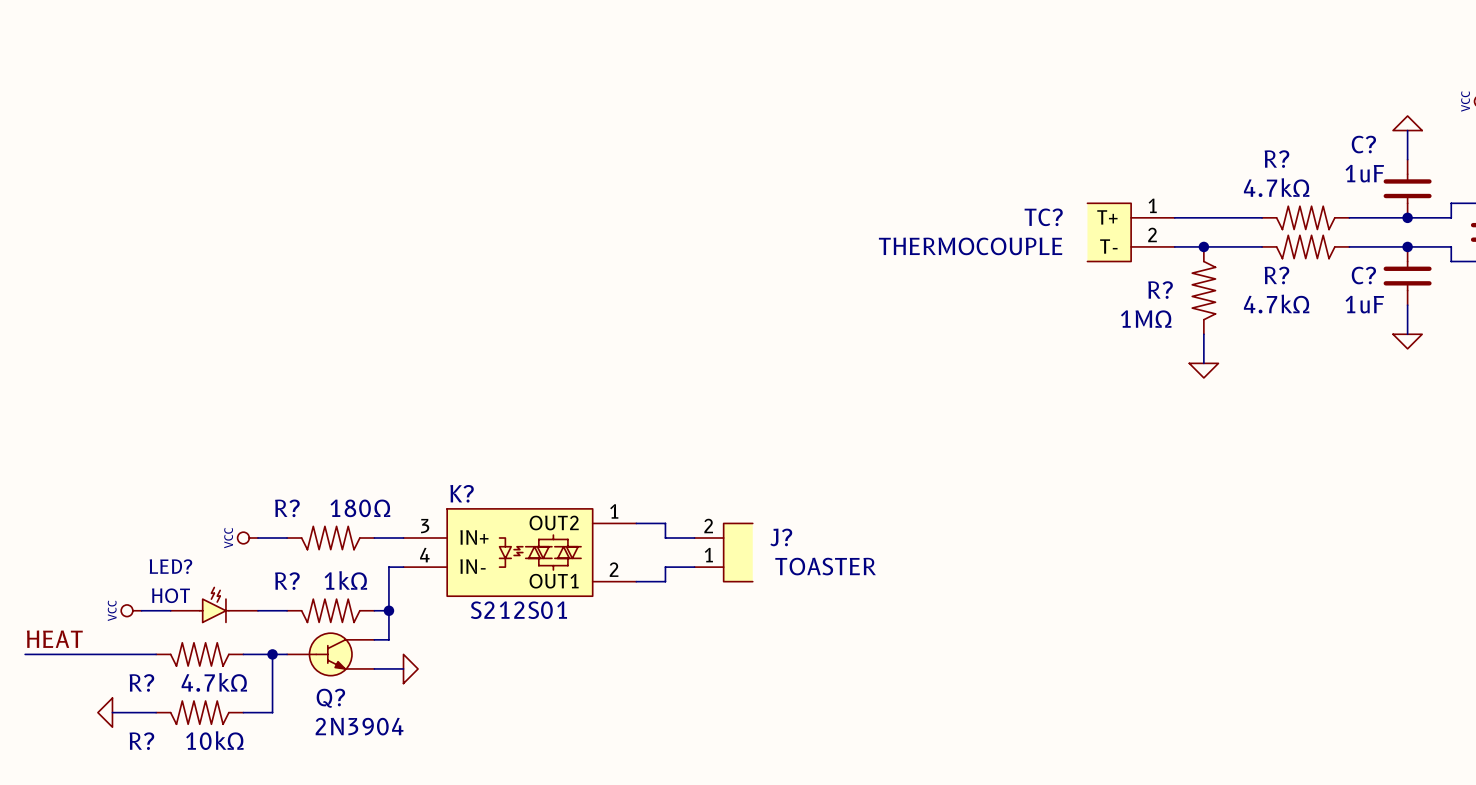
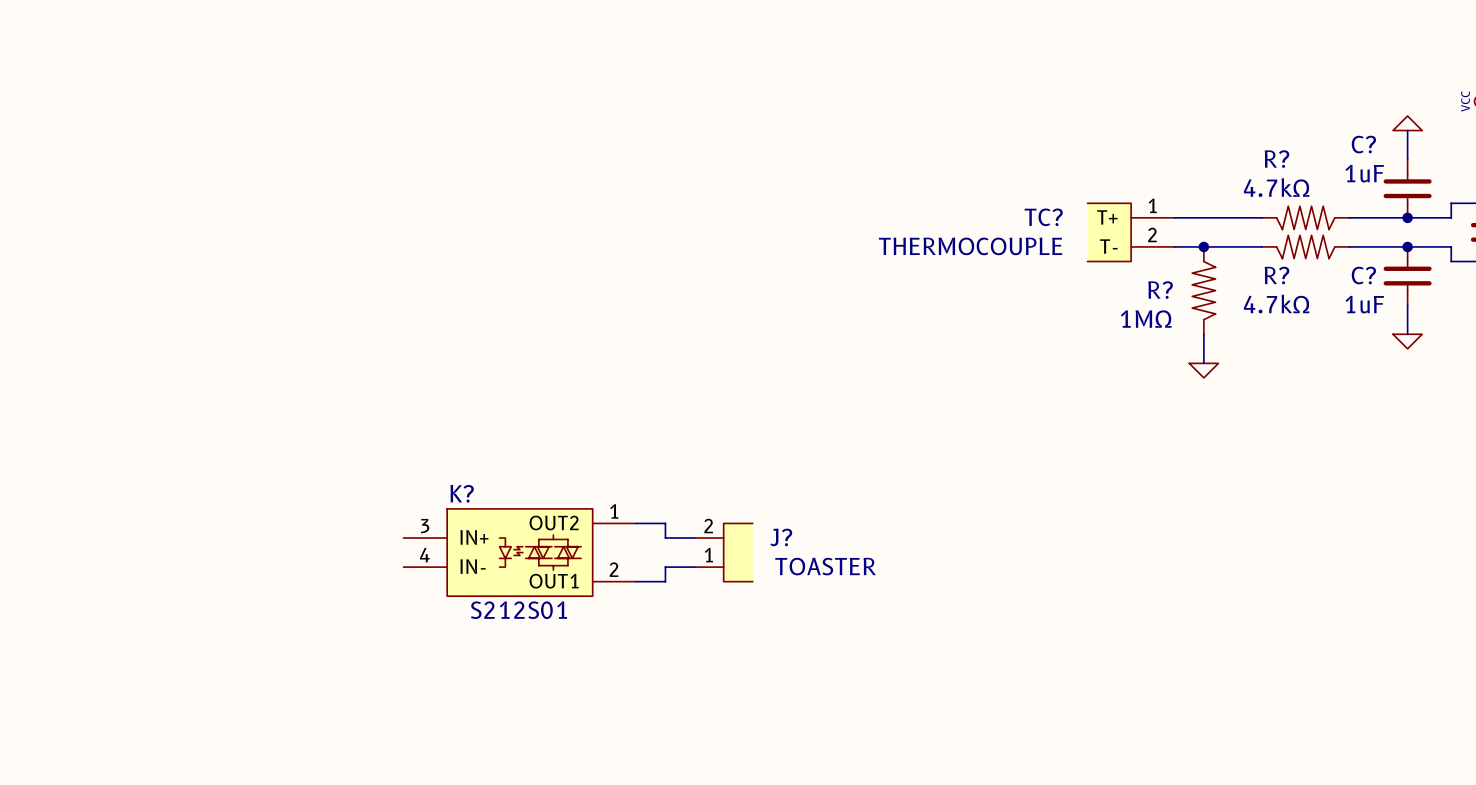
power symbol: VCC (247, 538) -> none
wire: (257, 538) (287, 538) -> none
R?: 180Ω (330, 538) -> none
wire: (374, 538) (403, 538) -> none
wire: (403, 567) (388, 567) (388, 639) (374, 639) -> none
LED?: HOT (214, 604) -> none
power symbol: VCC (131, 610) -> none
wire: (141, 610) (170, 610) -> none
wire: (257, 610) (287, 610) -> none
R?: 1kΩ (330, 610) -> none
wire: (374, 610) (388, 610) -> none
junction: (388, 610) -> none
label: HEAT (54, 639) -> none
wire: (25, 654) (156, 654) -> none
R?: 4.7kΩ (199, 654) -> none
wire: (243, 654) (287, 654) -> none
wire: (272, 654) (272, 712) (243, 712) -> none
junction: (272, 654) -> none
Q?: 2N3904 (330, 654) -> none
wire: (374, 668) (403, 668) -> none
power symbol: (410, 668) -> none
power symbol: (105, 712) -> none
wire: (112, 712) (156, 712) -> none
R?: 10kΩ (199, 712) -> none

